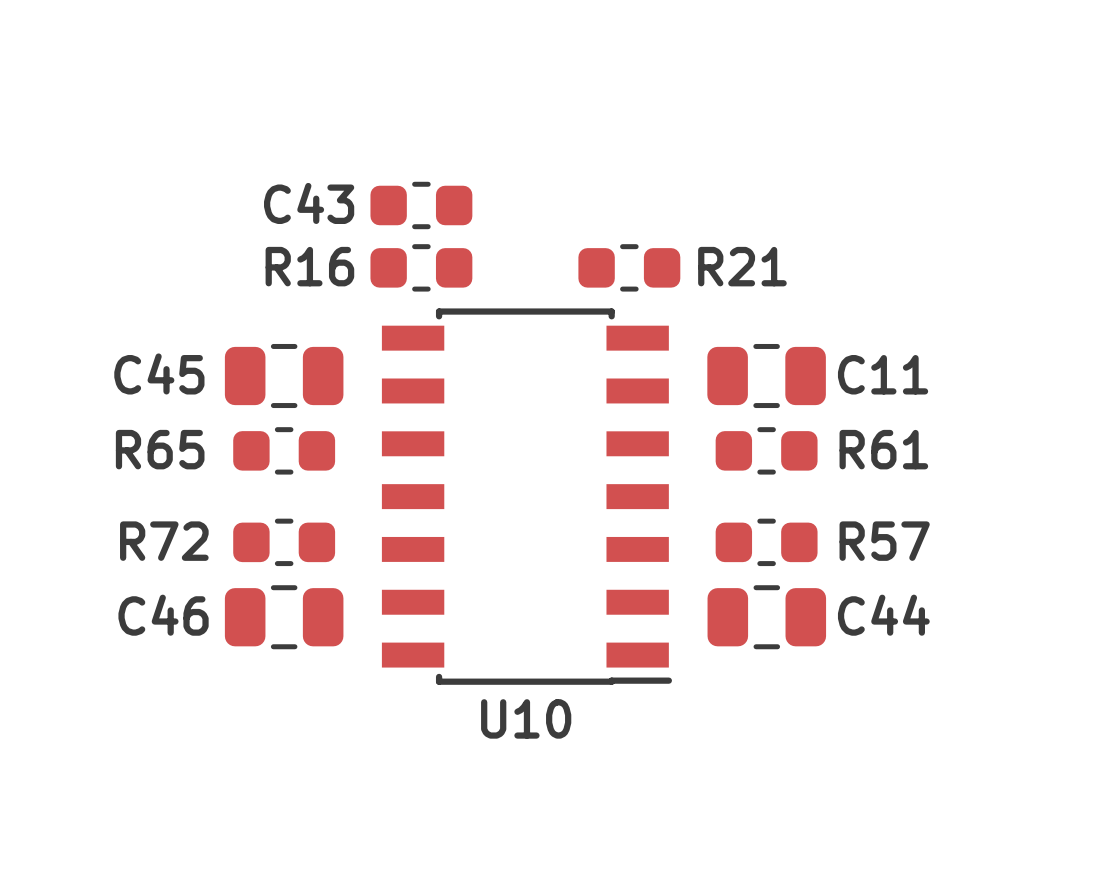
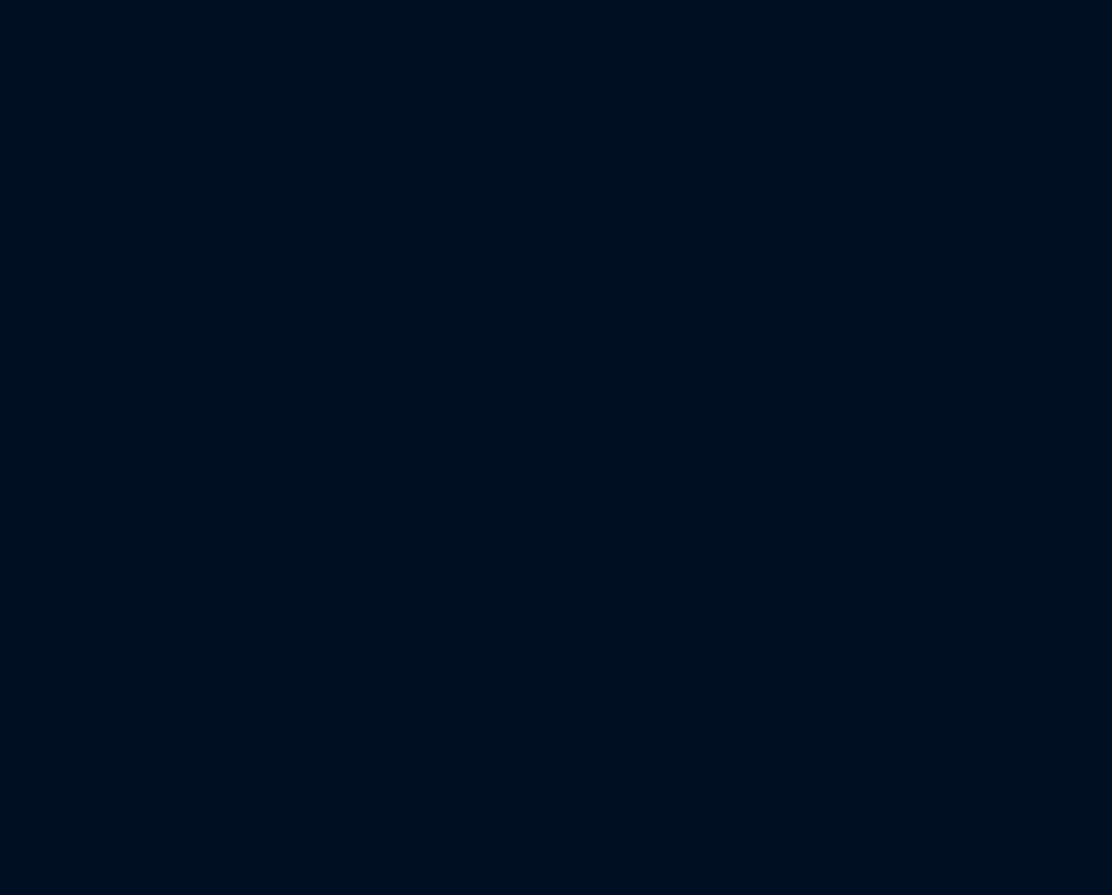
C43: (421, 205) -> none
R16: (421, 267) -> none
R21: (629, 267) -> none
C45: (284, 376) -> none
C11: (766, 376) -> none
R65: (284, 450) -> none
R61: (766, 450) -> none
U10: (526, 496) -> none
R72: (284, 542) -> none
R57: (766, 542) -> none
C46: (284, 617) -> none
C44: (766, 617) -> none

